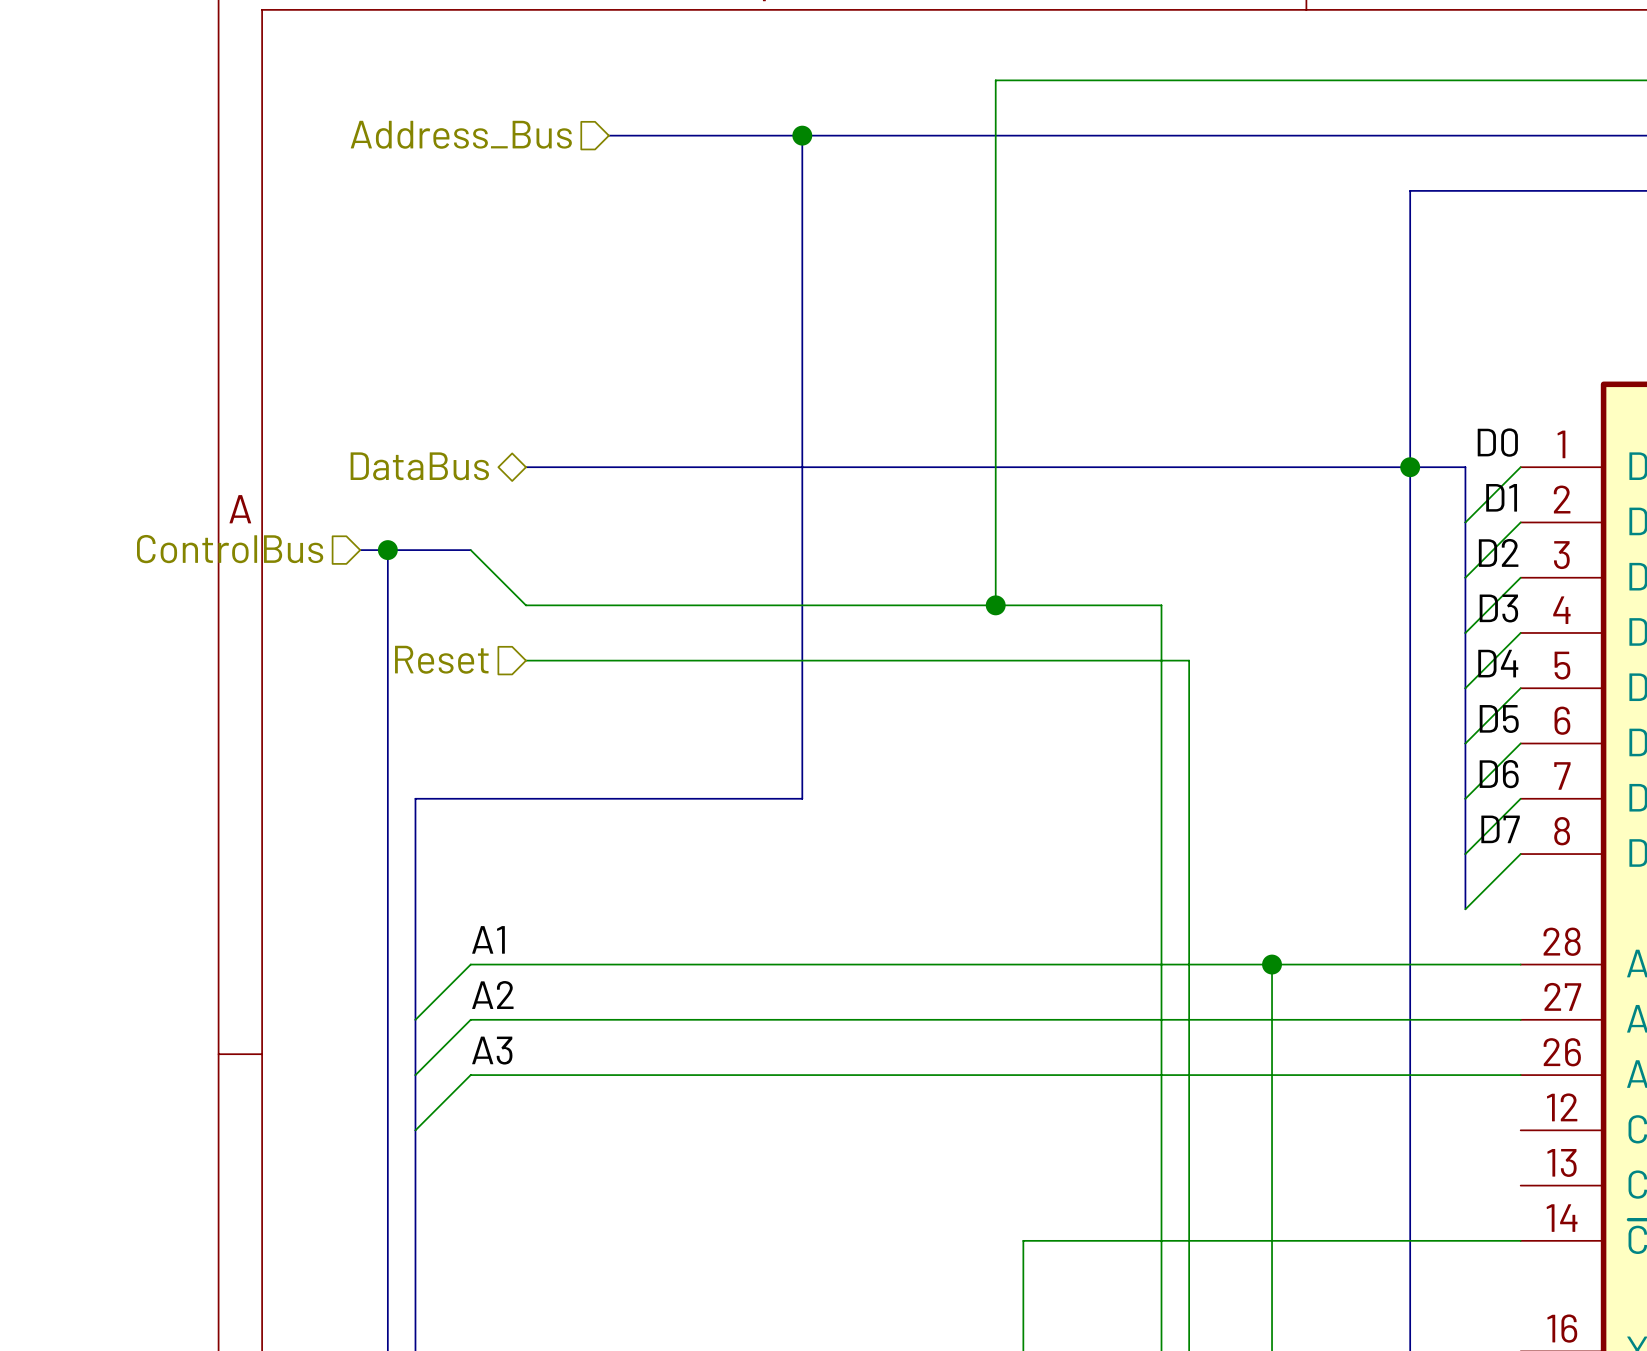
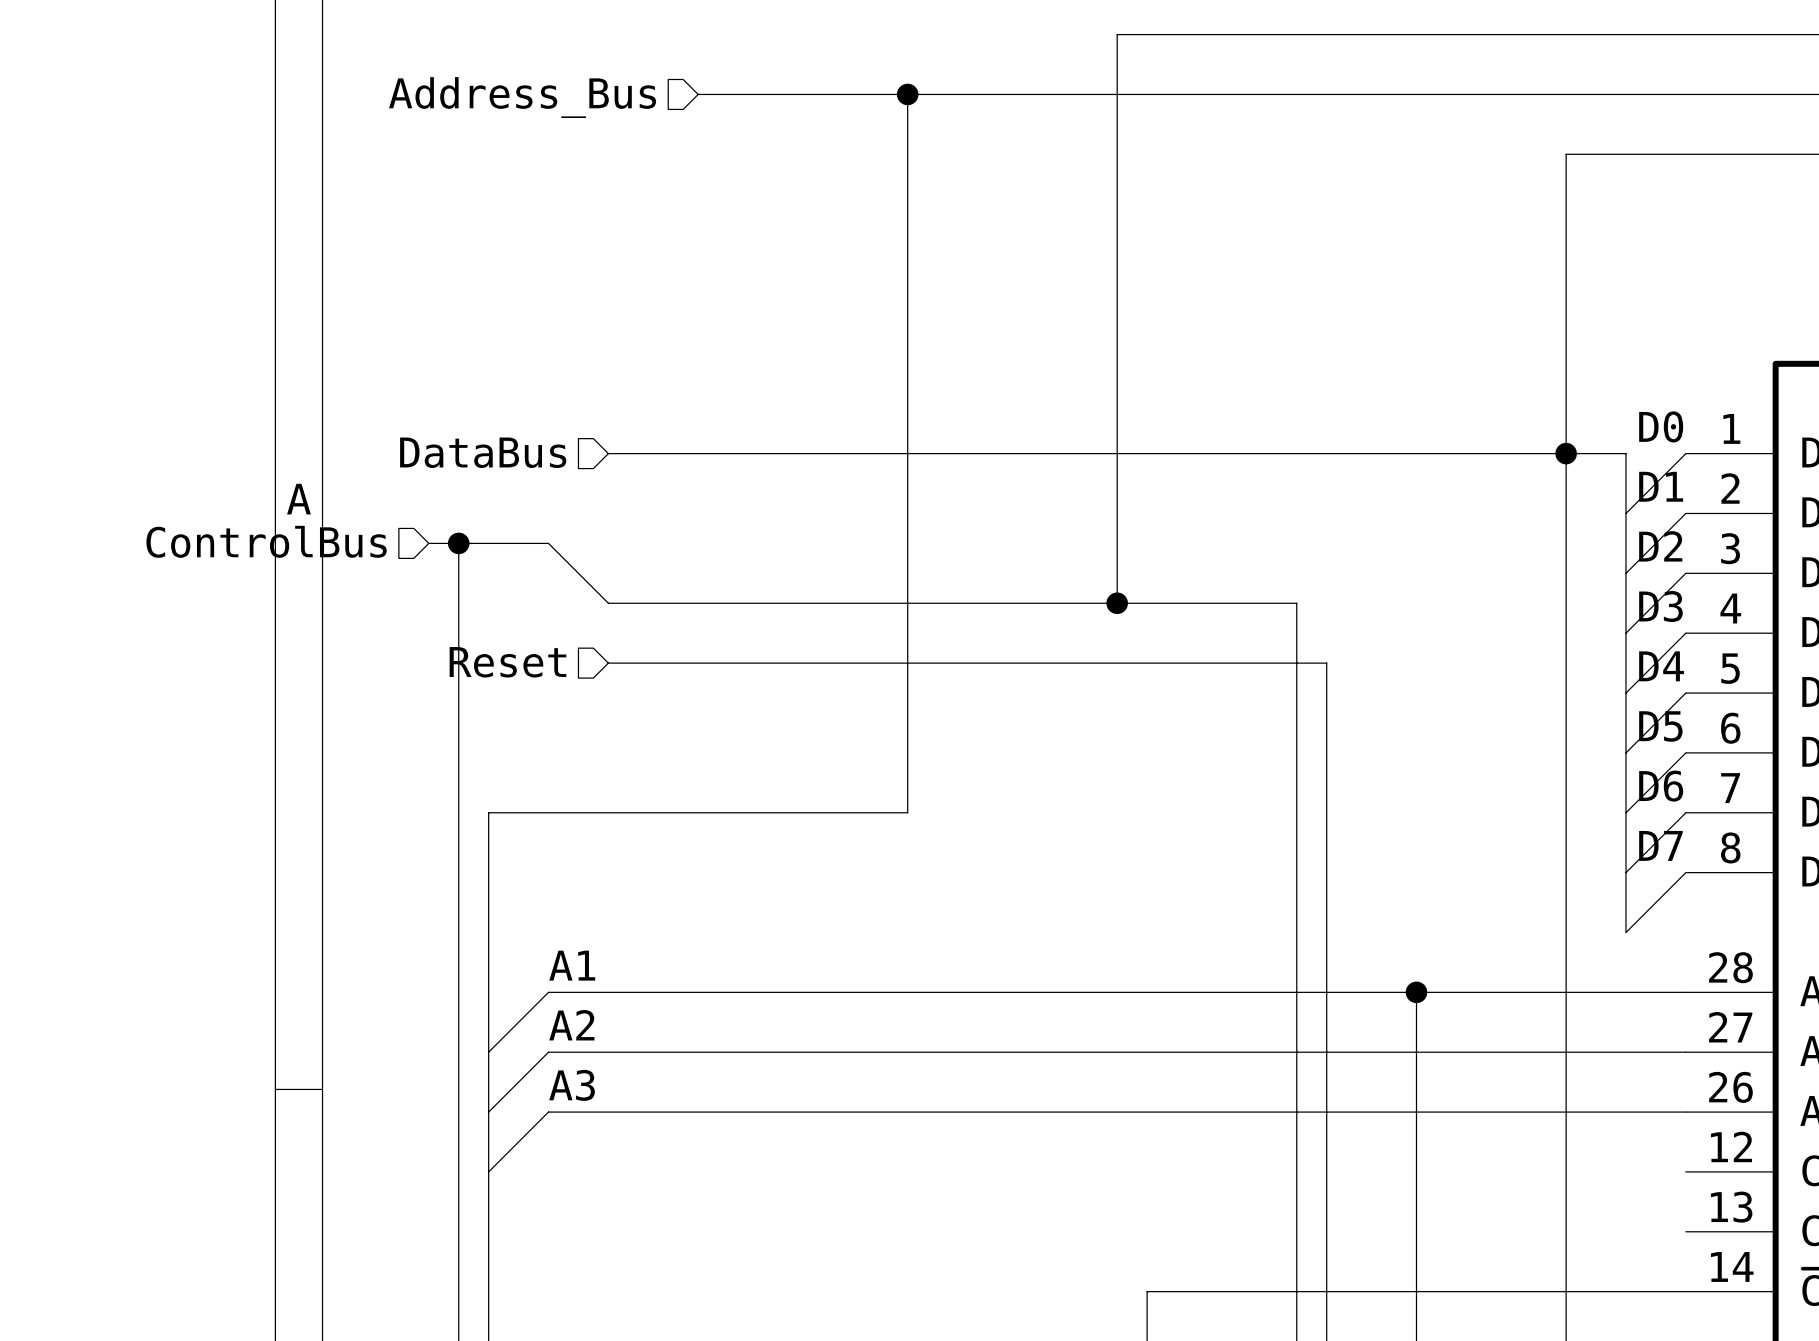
hierarchical label shape: bidirectional (419, 466) -> input (483, 452)

